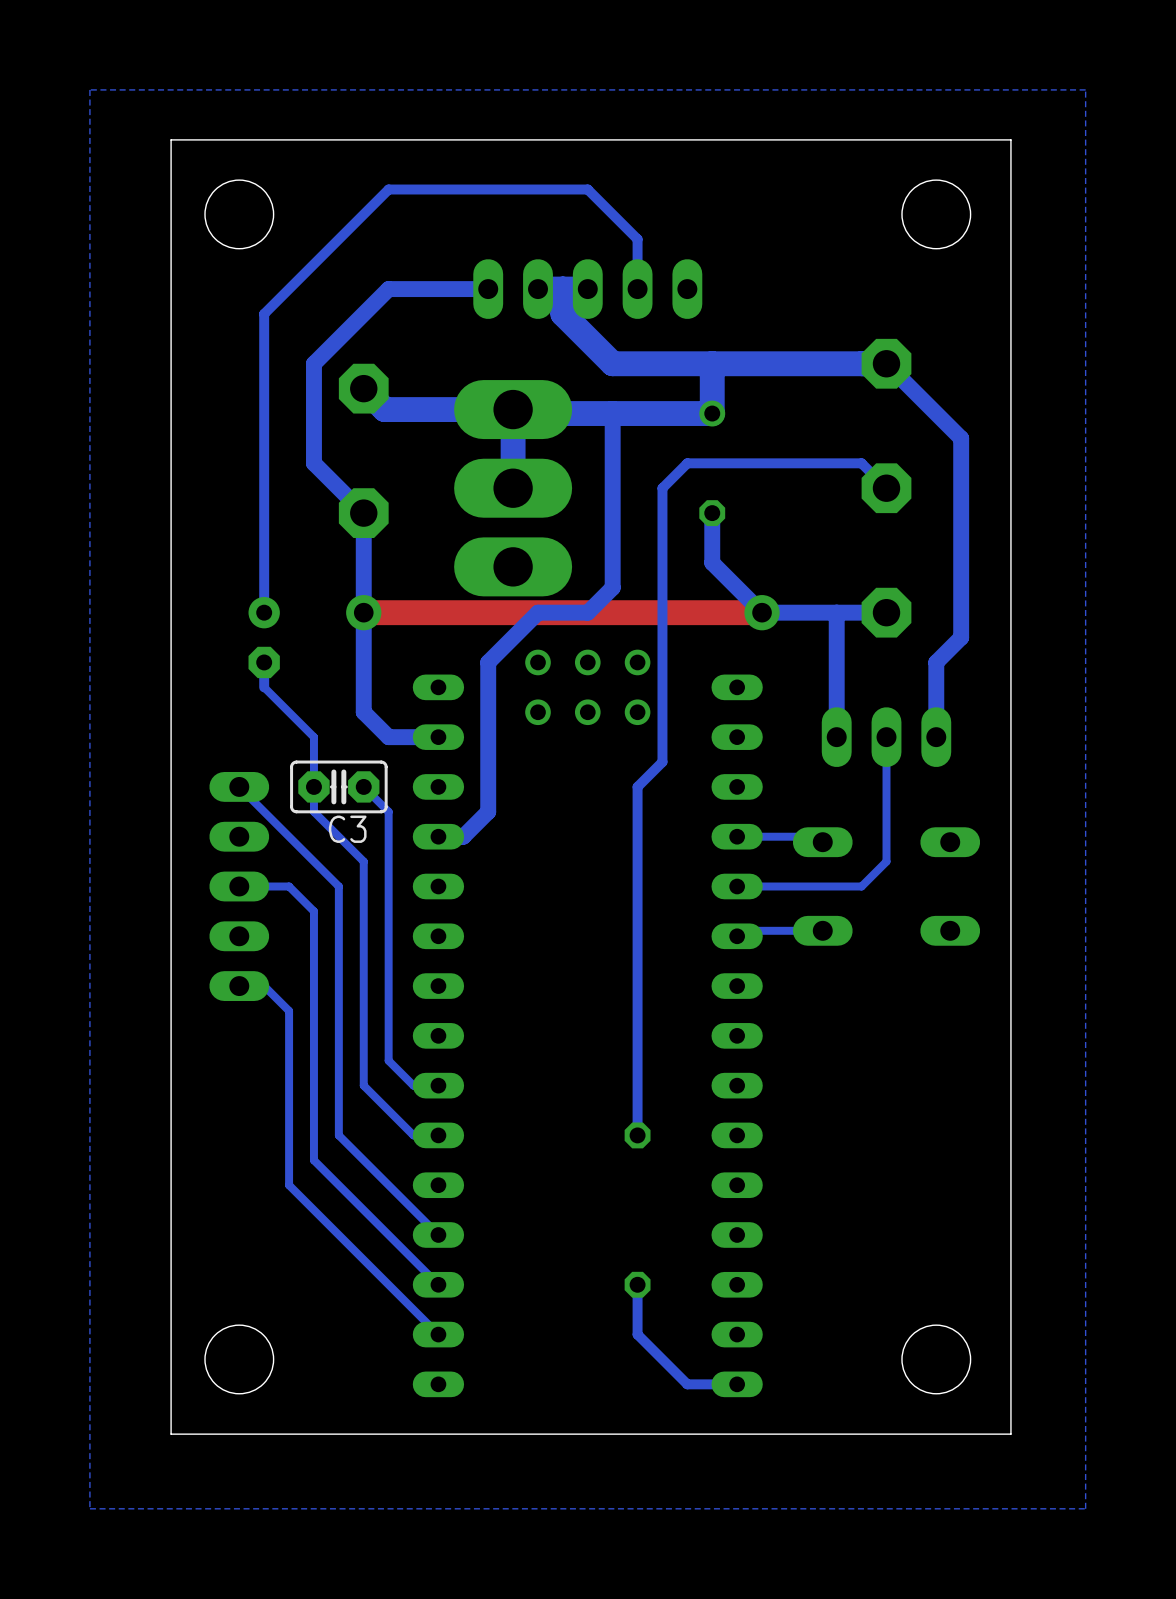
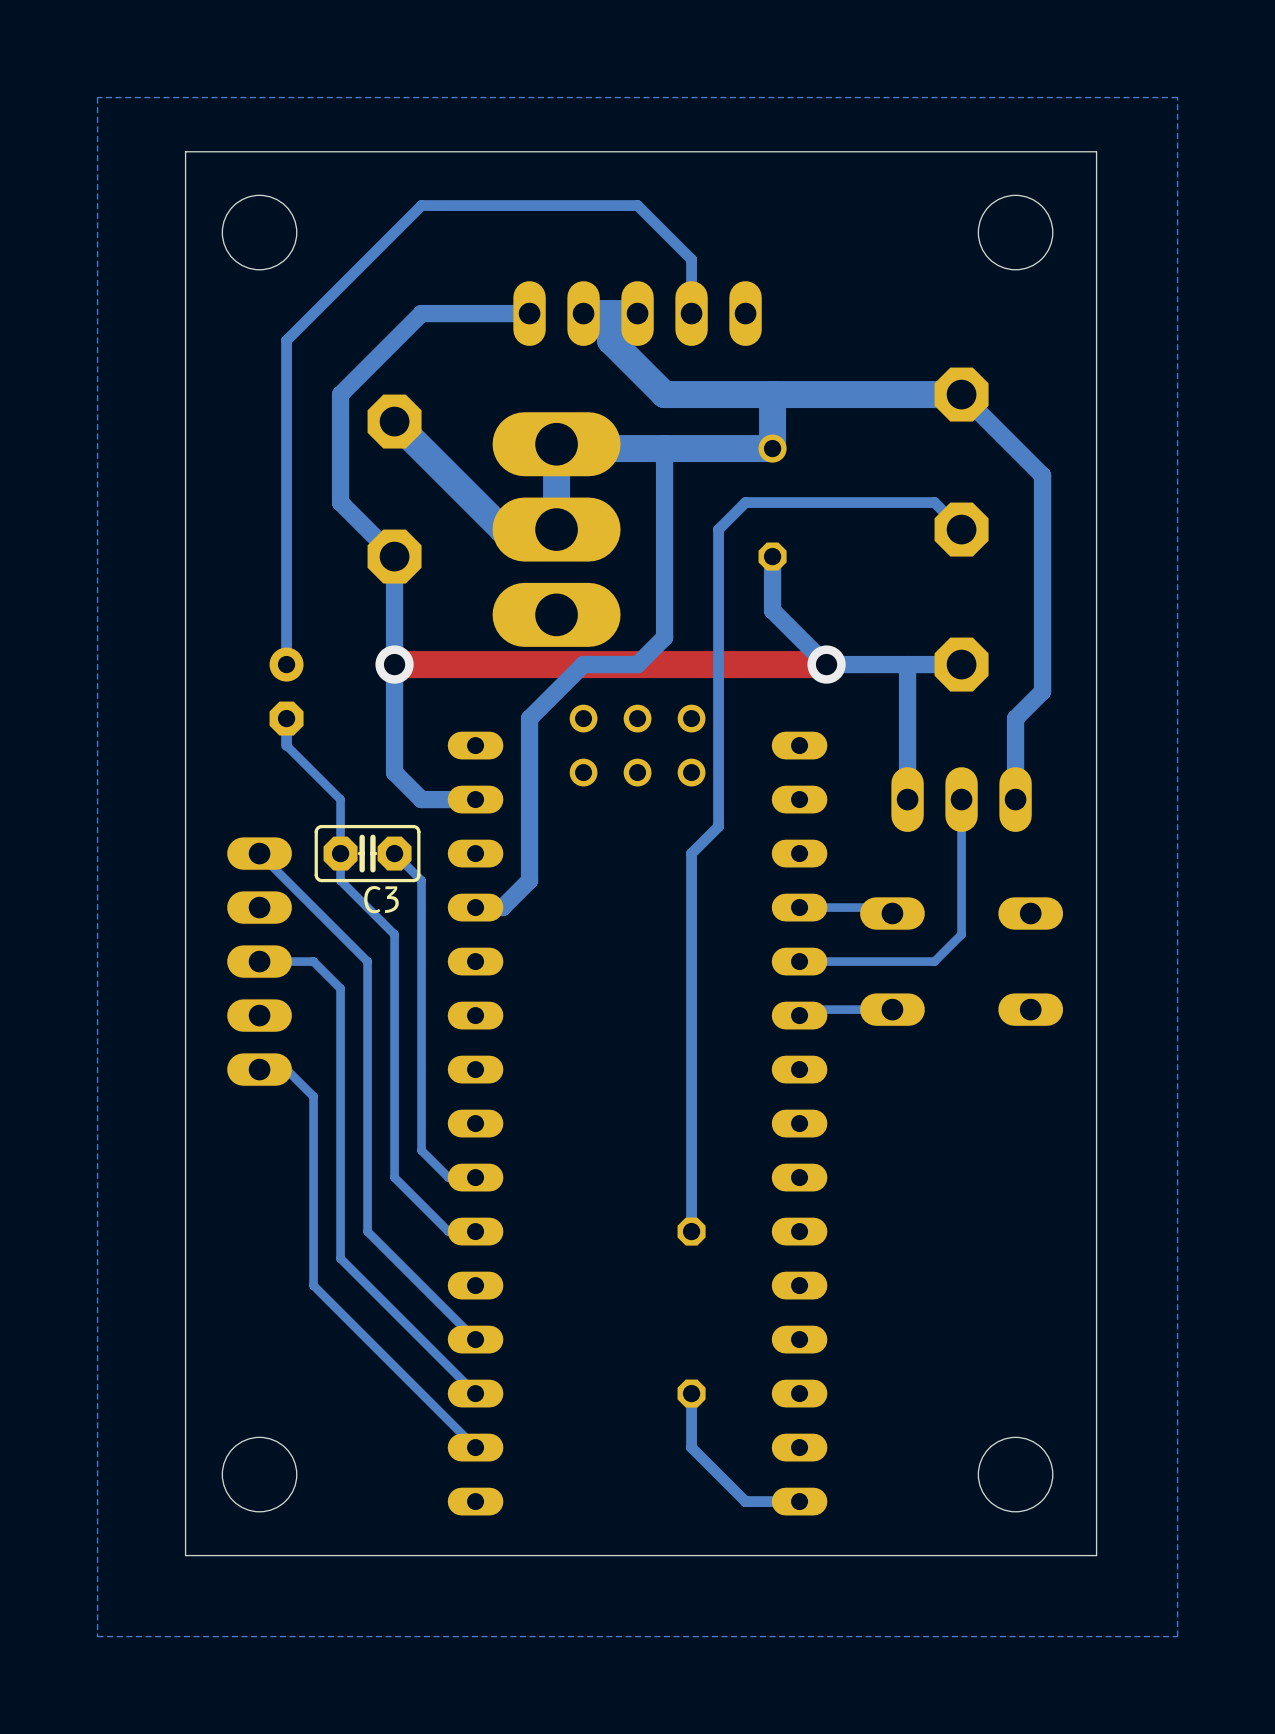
bottom track: (384, 409) (513, 409) (517, 413) -> (417, 444) (502, 529) (556, 529)

